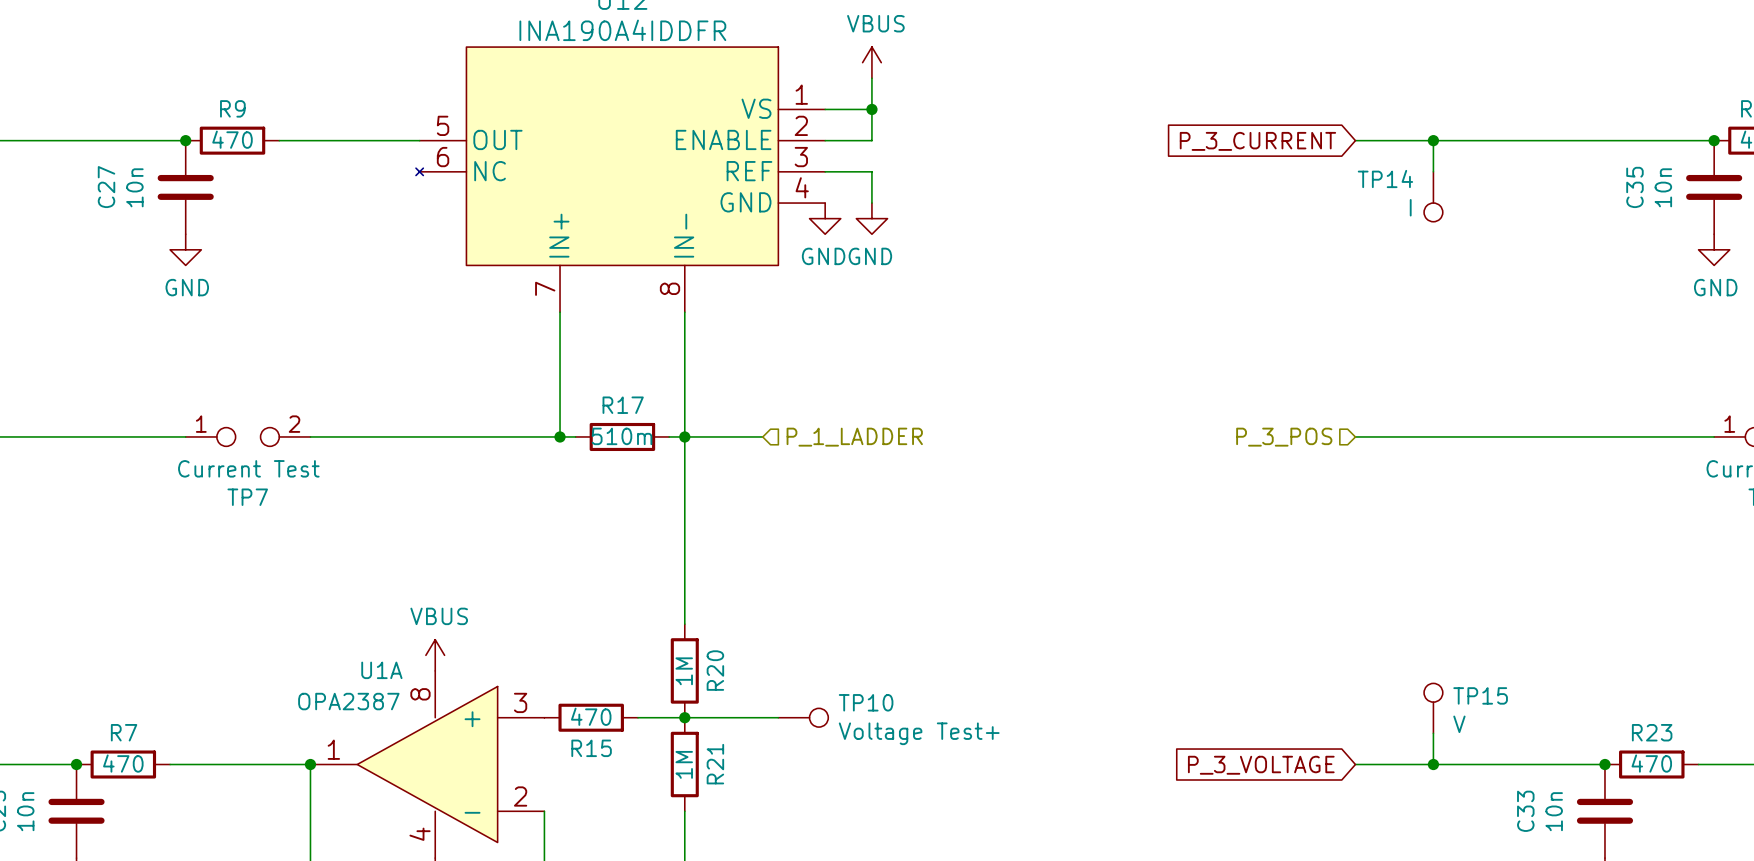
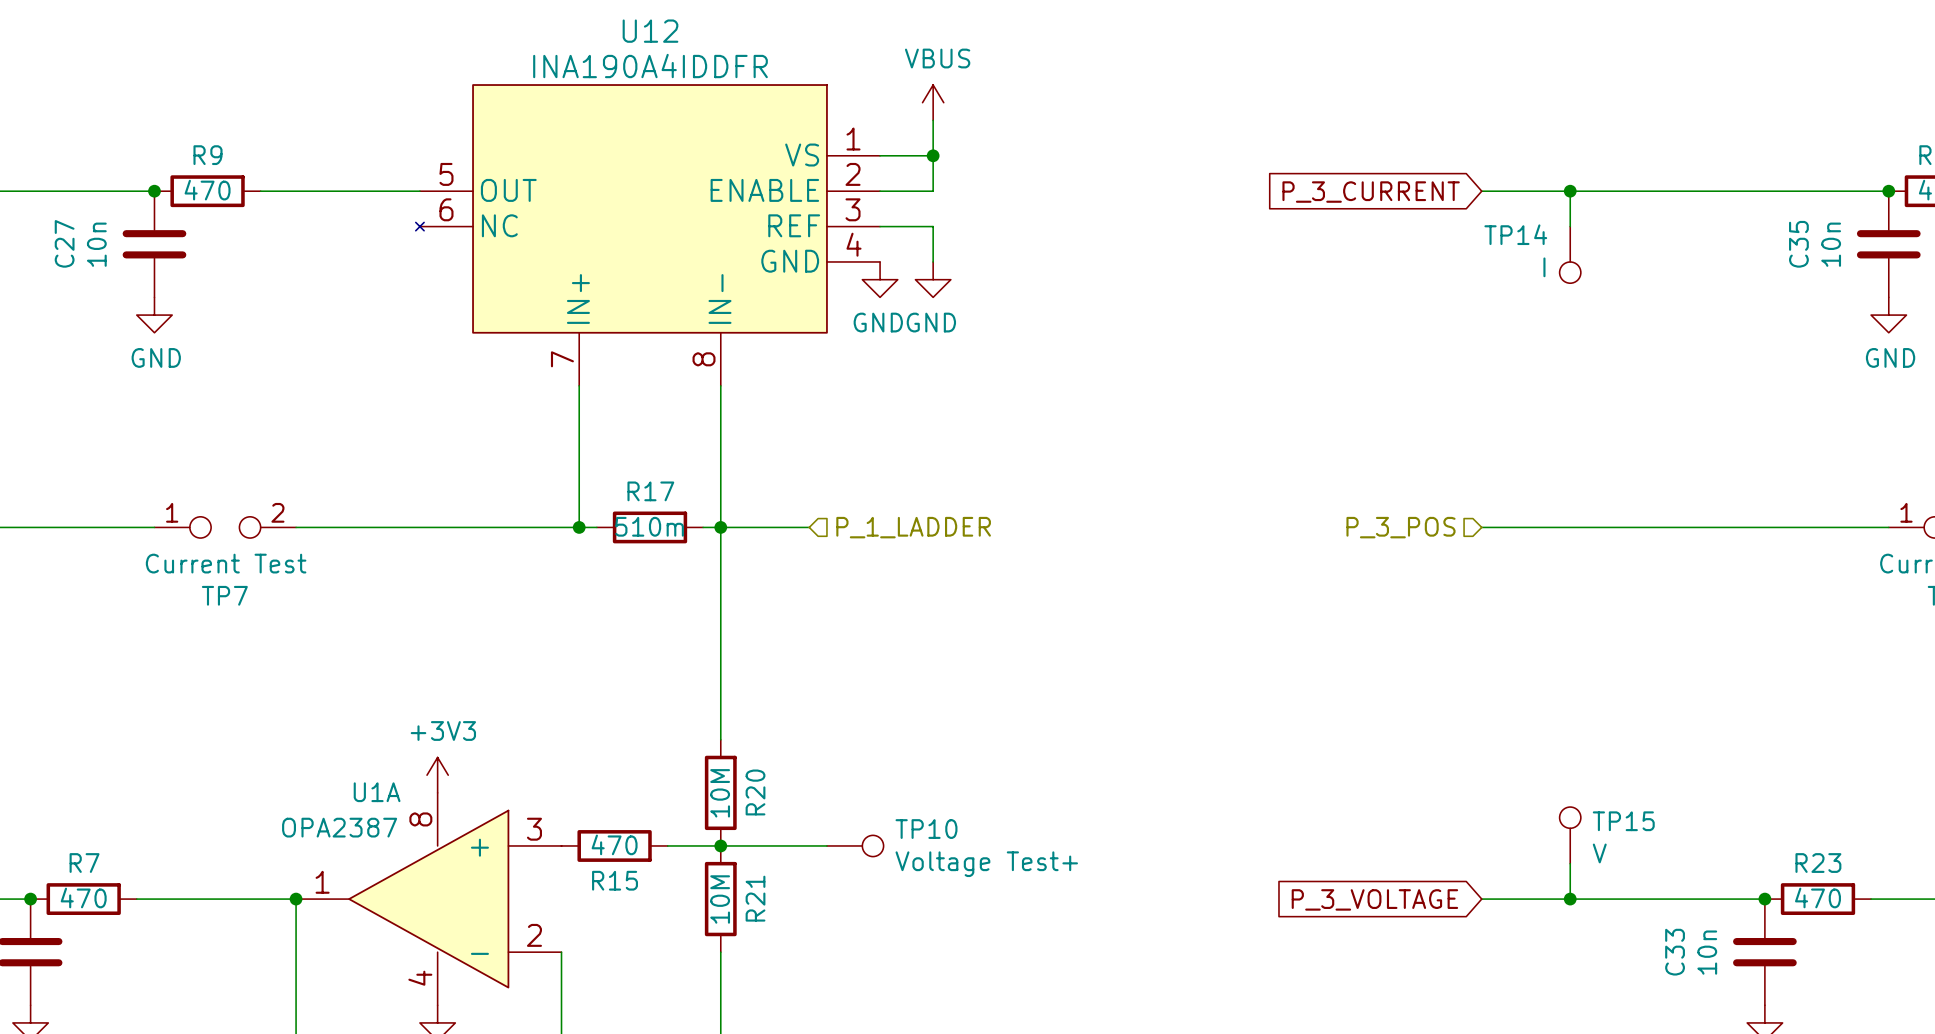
power symbol: VBUS (435, 655) -> +3V3 (437, 775)
R20 value: 1M (684, 671) -> 10M (720, 793)
R21 value: 1M (684, 764) -> 10M (720, 899)

